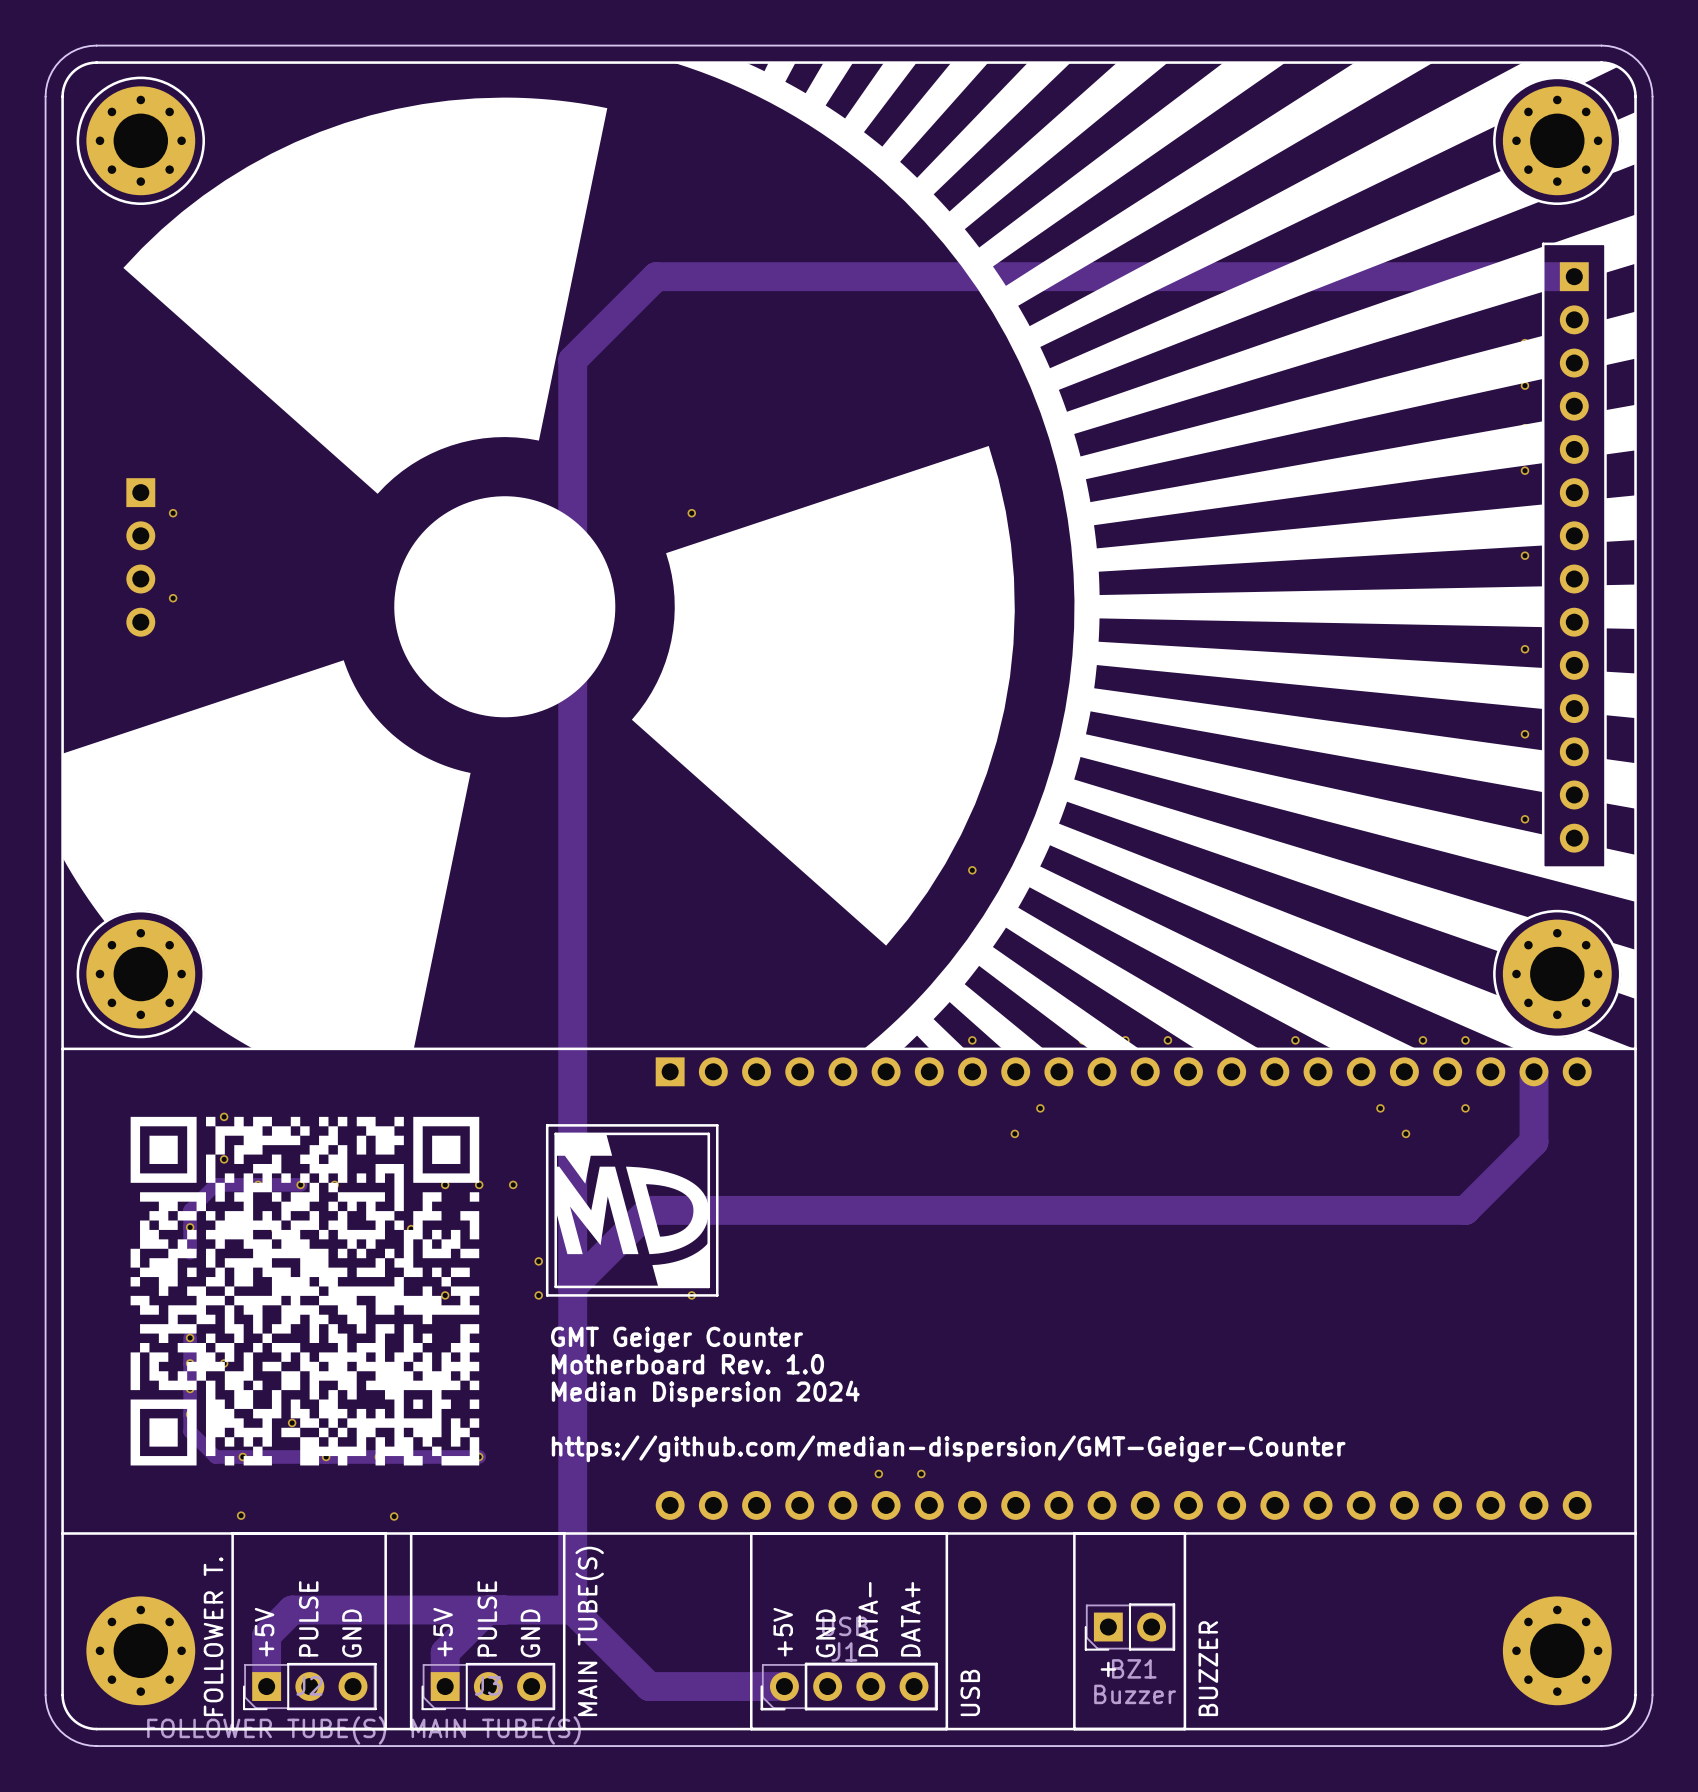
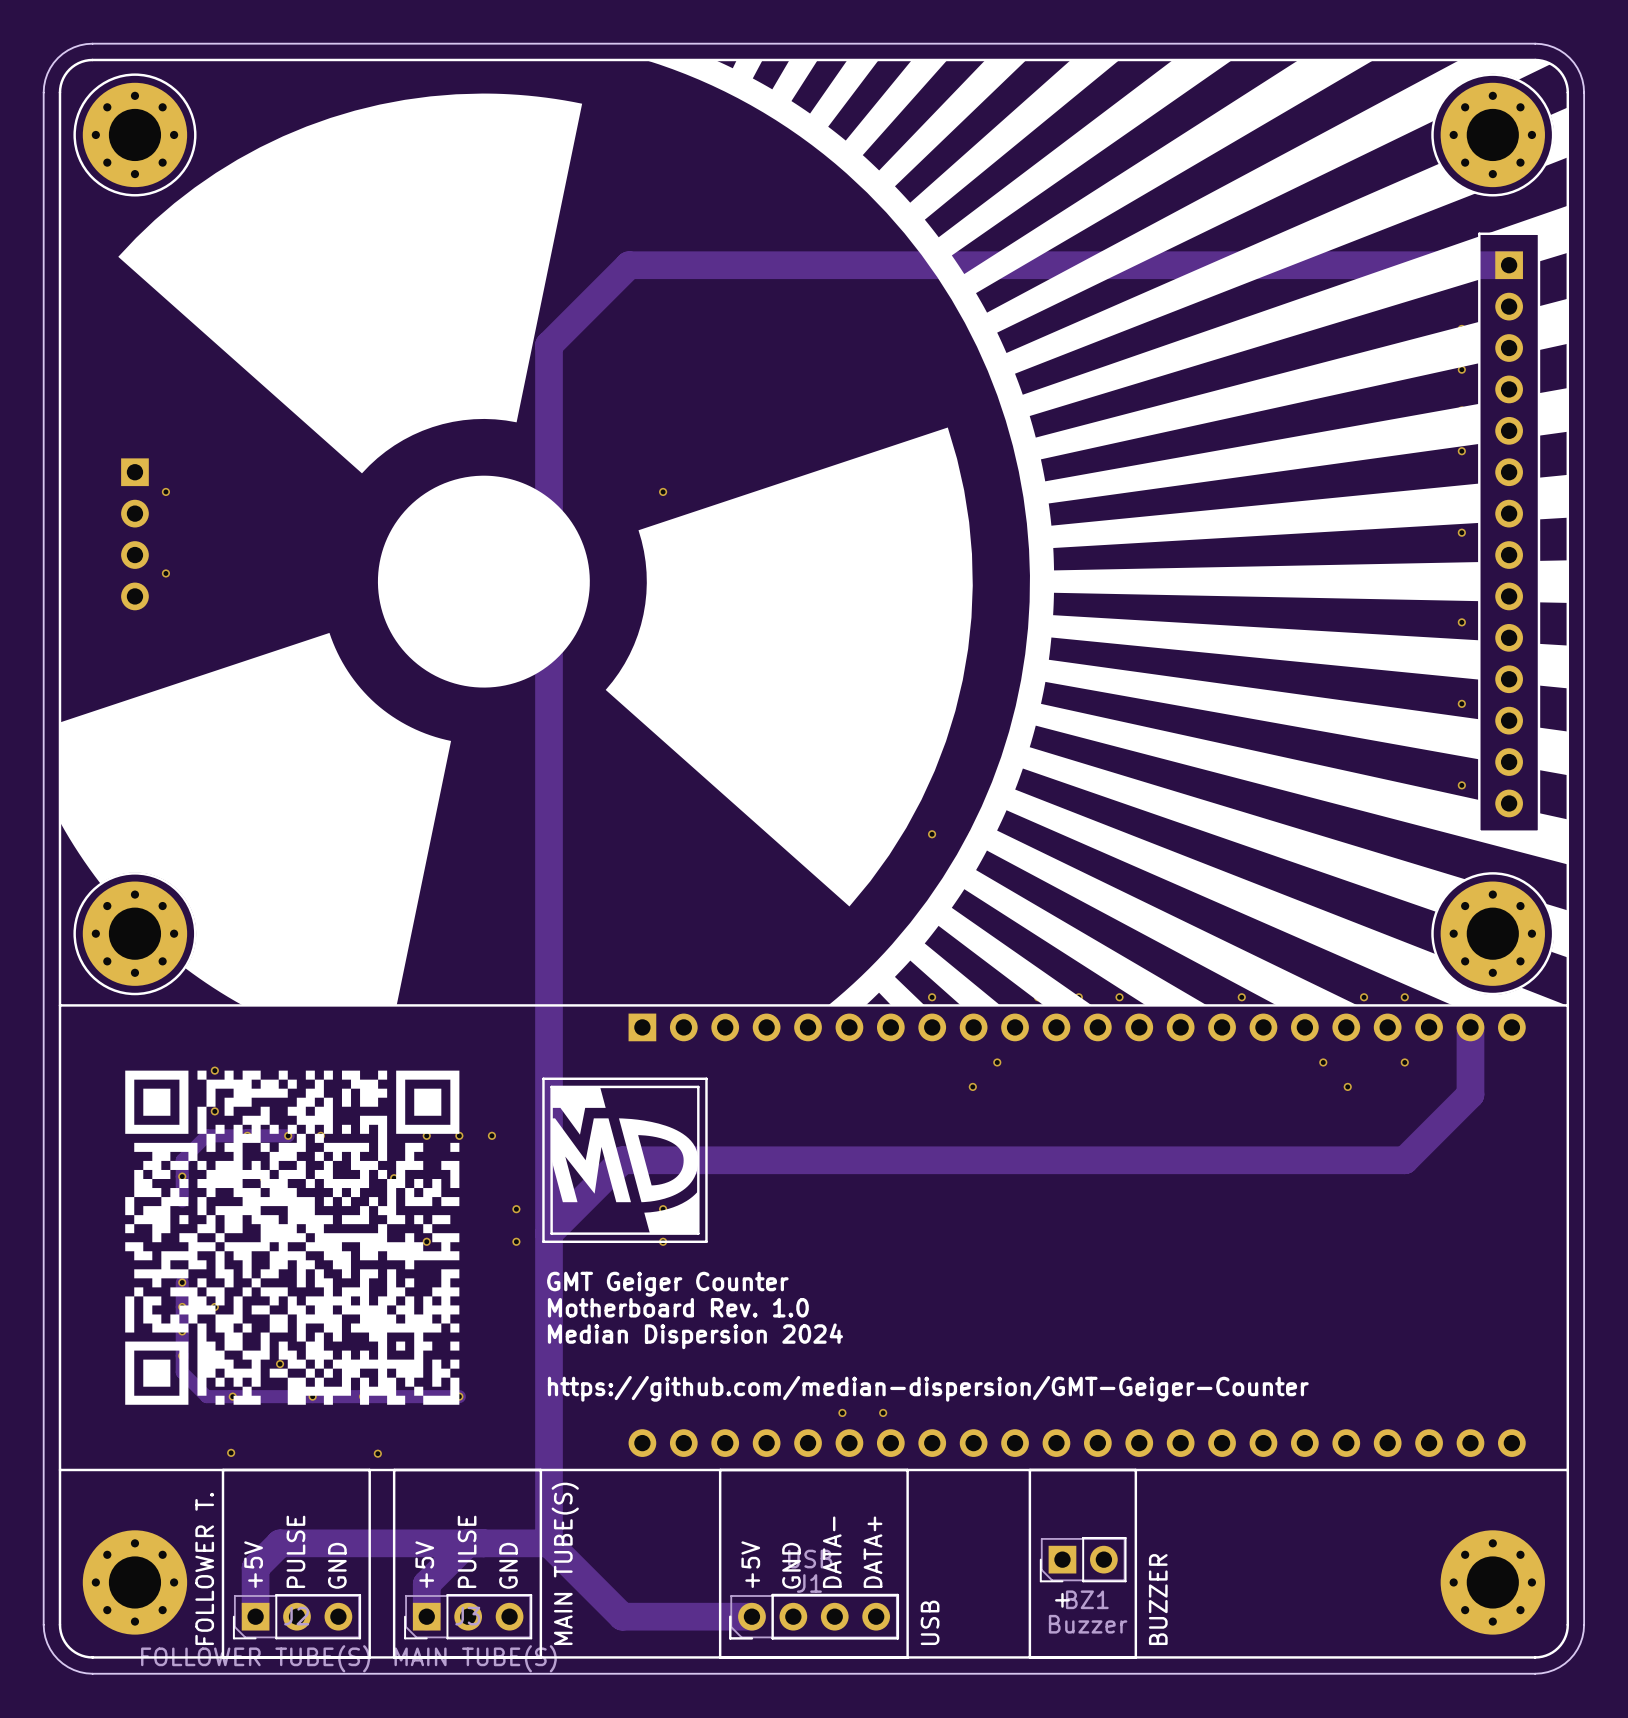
line: (566, 1125) (547, 1125) (547, 1295) (566, 1295) -> (543, 1078) (543, 1241)
line: (717, 1125) (717, 1295) -> (687, 1078) (706, 1078) (706, 1241) (687, 1241)
line: (575, 1133) (555, 1133) (555, 1286) (575, 1286) -> (551, 1086) (551, 1233)
line: (708, 1133) (708, 1286) -> (679, 1086) (698, 1086) (698, 1233) (679, 1233)
drawing position: (583, 1158) -> (578, 1110)
drawing: [625, 1166, 709, 1255] -> none
drawing: none -> [618, 1118, 699, 1203]
drawing position: (597, 1210) -> (591, 1160)
drawing position: (680, 1264) -> (671, 1212)
text position: GMT Geiger Counter (676, 1339) -> GMT Geiger Counter (667, 1284)
text position: Motherboard Rev. 1.0 (687, 1364) -> Motherboard Rev. 1.0 (678, 1307)
text position: Median Dispersion 2024 (705, 1394) -> Median Dispersion 2024 (695, 1336)
text position: https://github.com/median-dispersion/GMT-Geiger-Counter (948, 1448) -> https://github.com/median-dispersion/GMT-Geiger-Counter (928, 1388)

